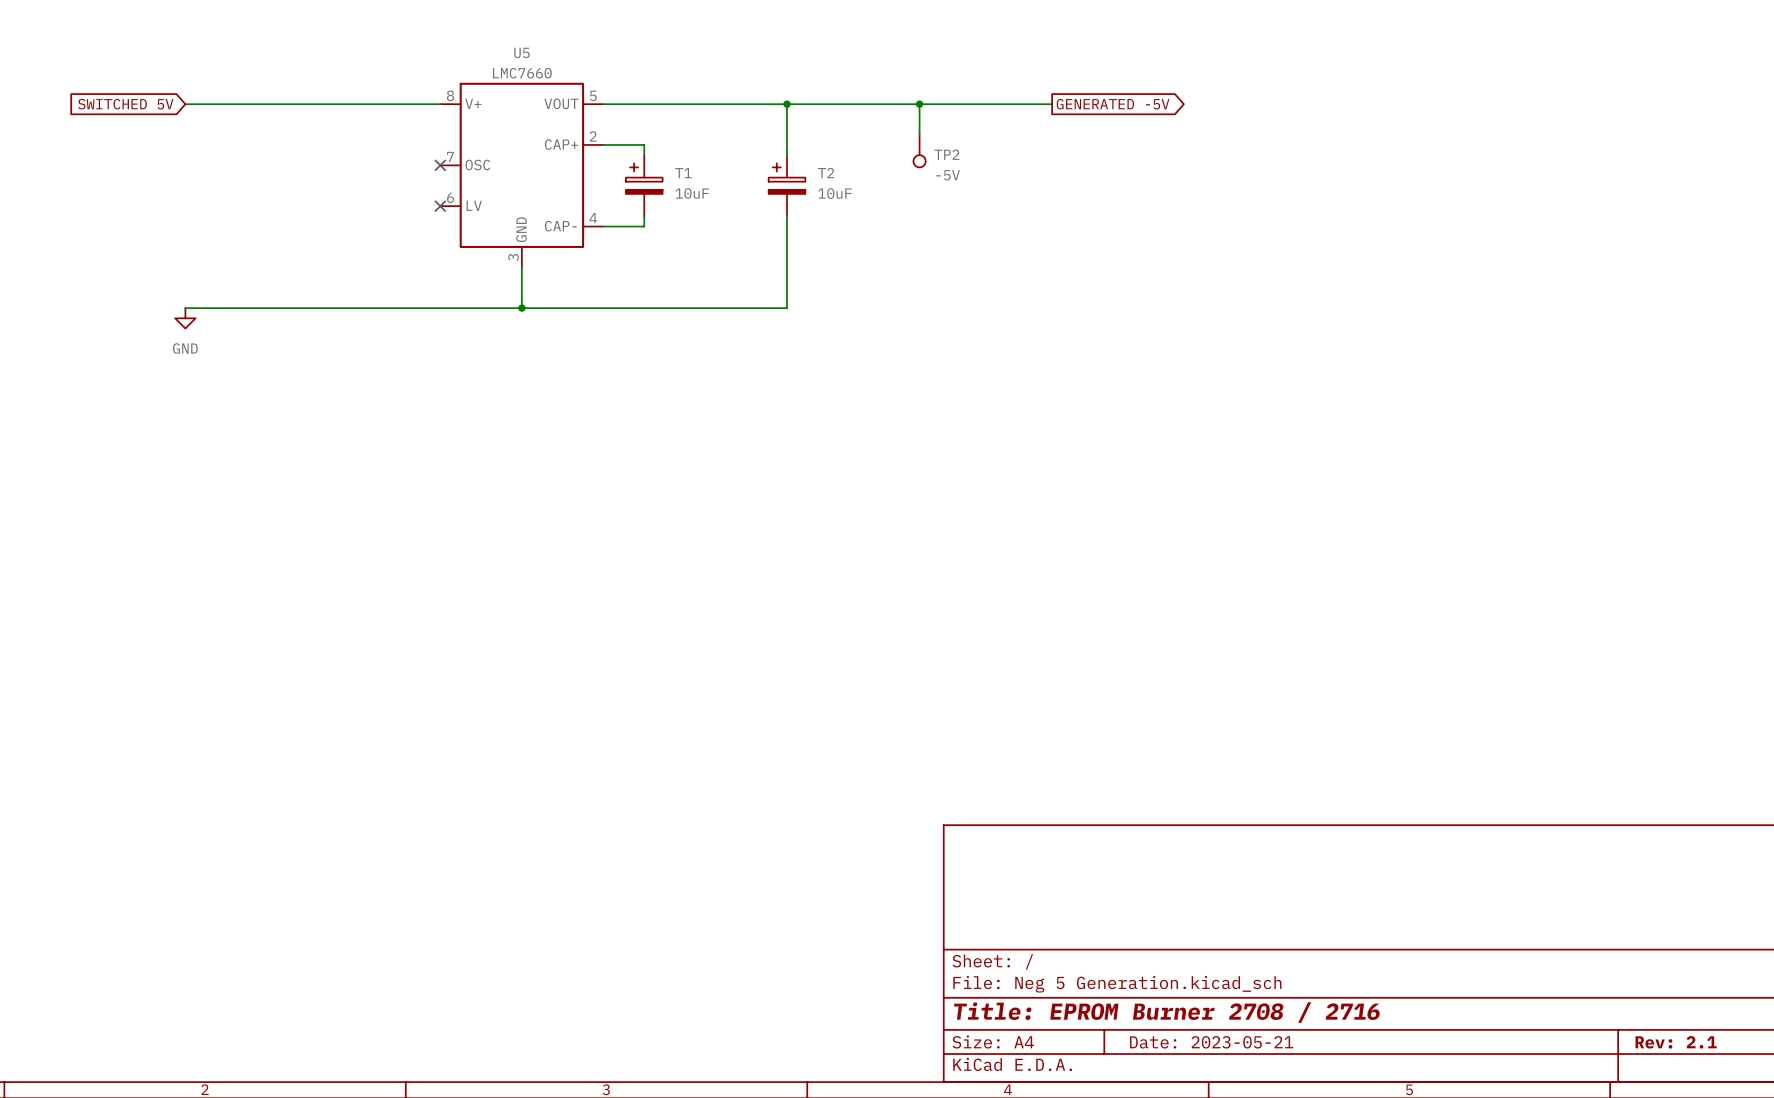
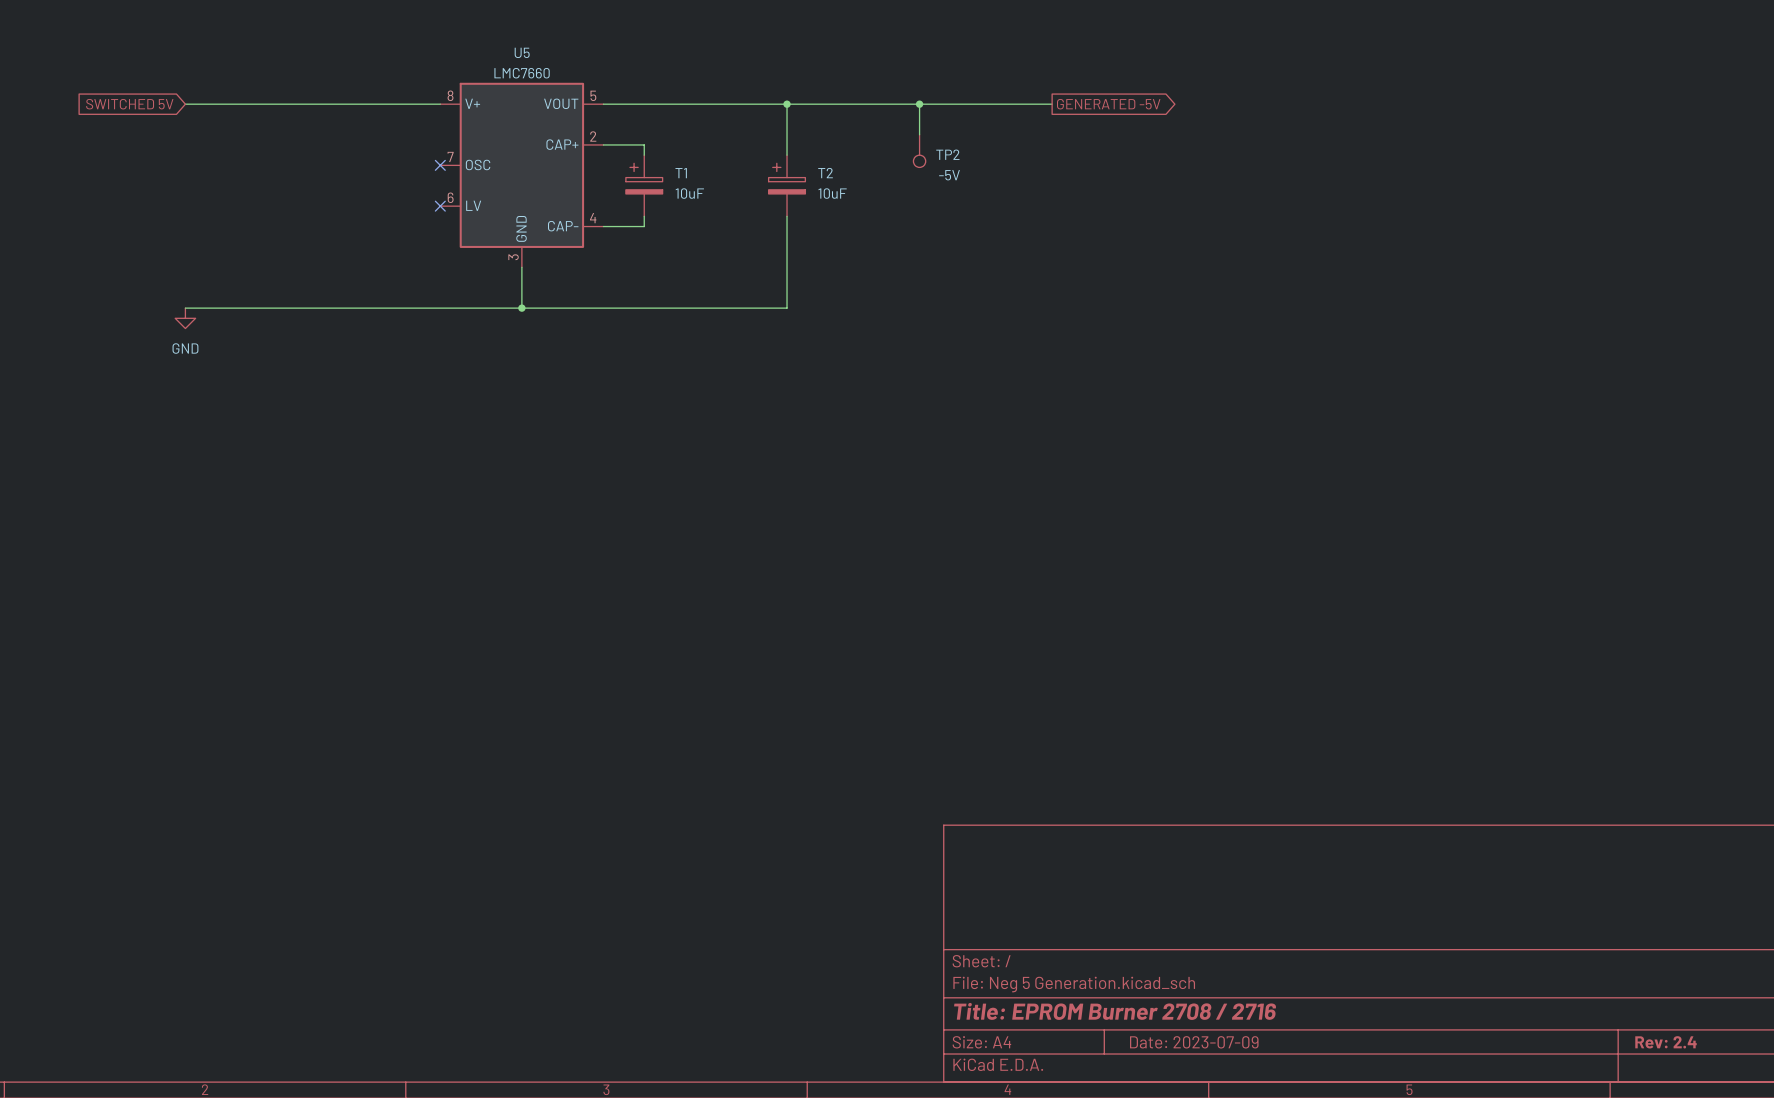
title block: Date: 2023-05-21 (1211, 1042) -> Date: 2023-07-09 (1194, 1042)
title block: Rev: 2.1 (1676, 1042) -> Rev: 2.4 (1665, 1042)

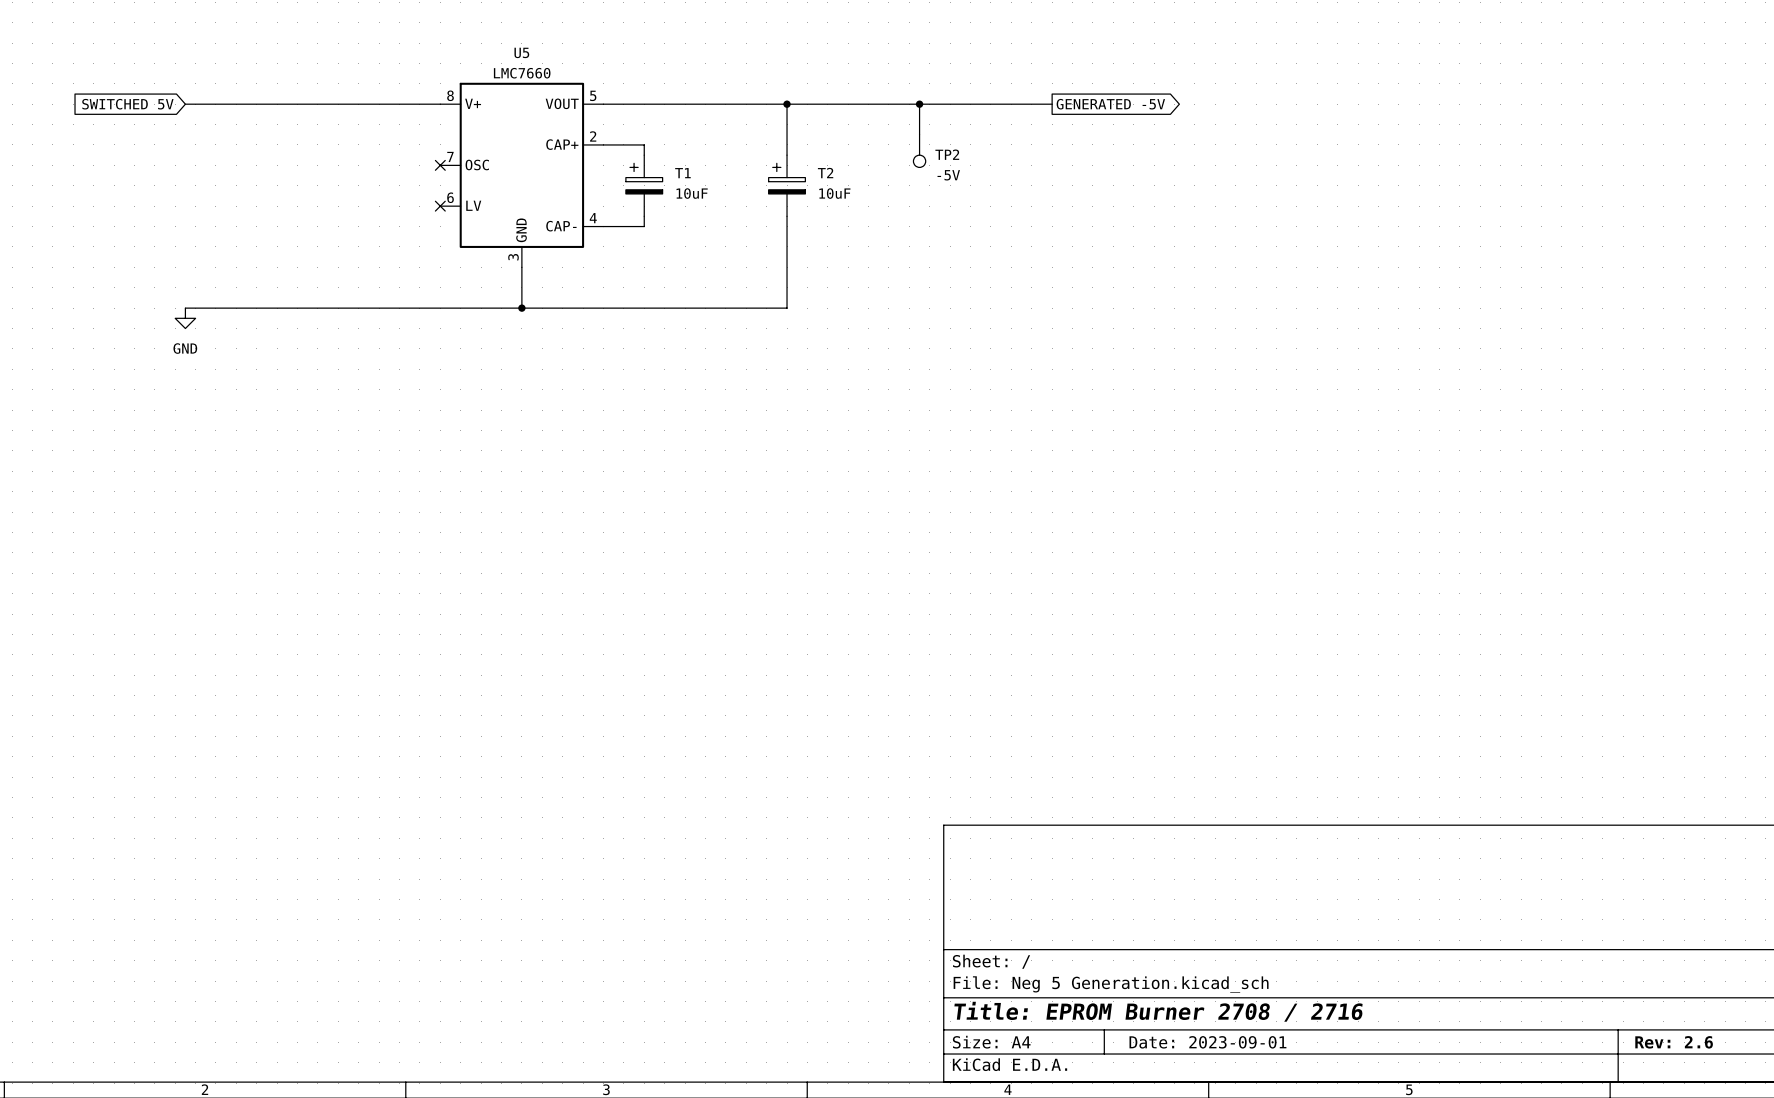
title block: Date: 2023-07-09 (1194, 1042) -> Date: 2023-09-01 (1207, 1042)
title block: Rev: 2.4 (1665, 1042) -> Rev: 2.6 (1674, 1042)

